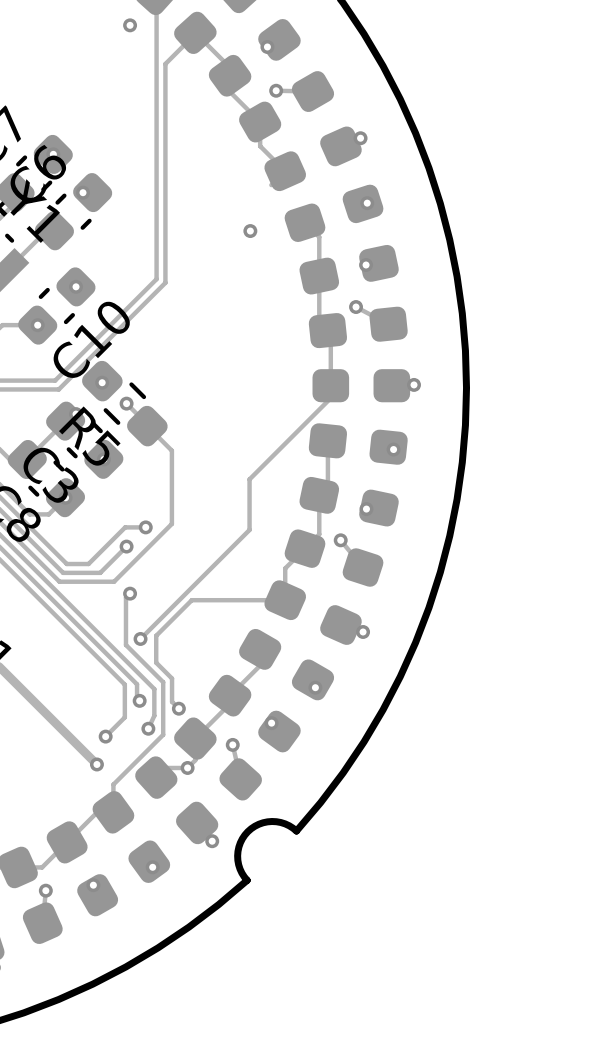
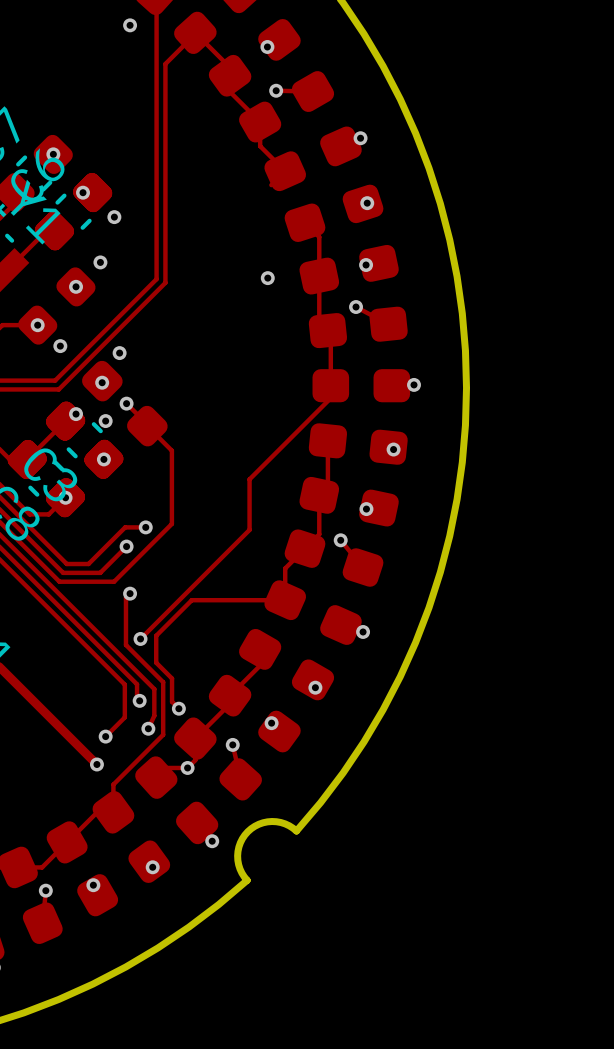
part: none -> (73, 211)
via: none -> (114, 217)
via position: (250, 231) -> (267, 278)
via: none -> (100, 262)
C10: (56, 306) -> none
via: none -> (60, 346)
via: none -> (119, 353)
R5: (124, 403) -> none
part: none -> (124, 403)
via: none -> (105, 421)
part: none -> (84, 440)
part: none -> (46, 478)

